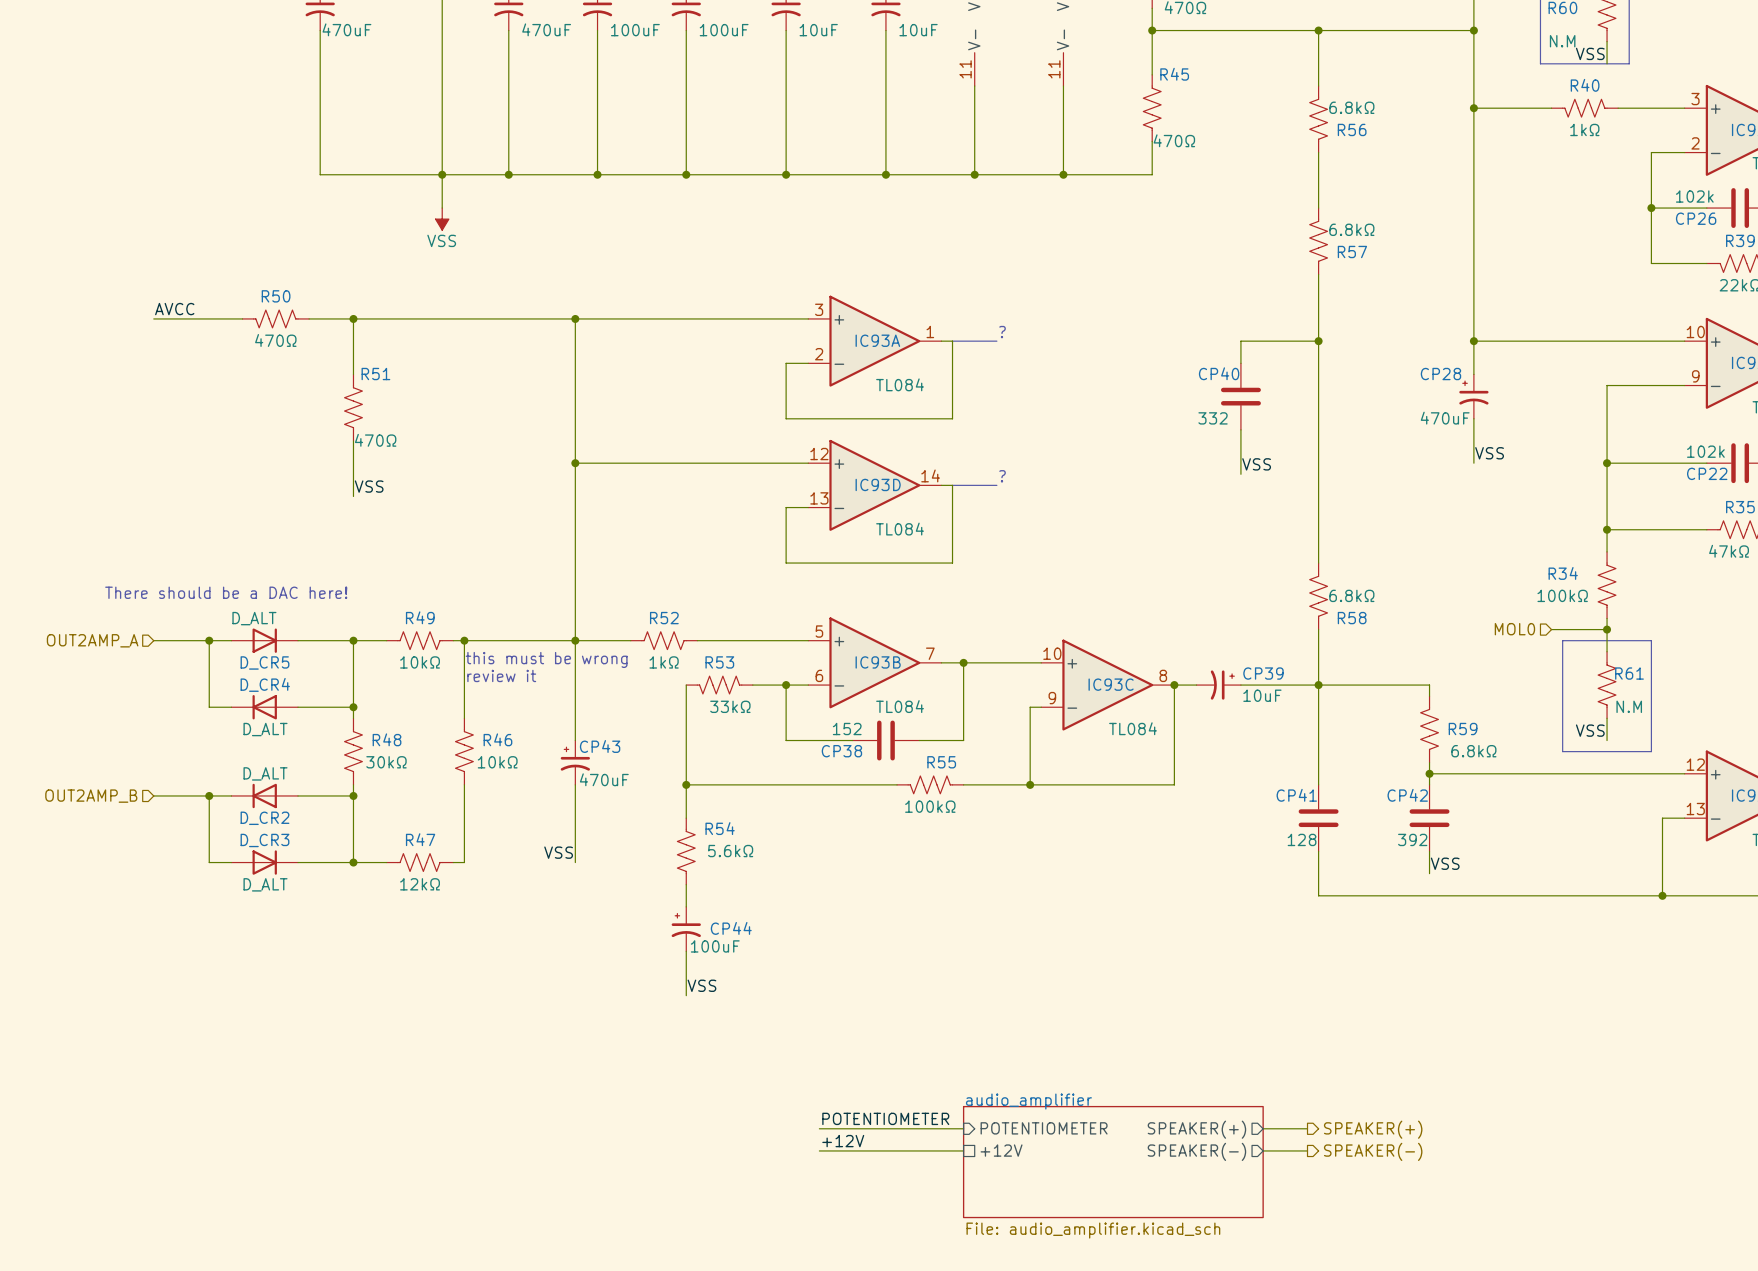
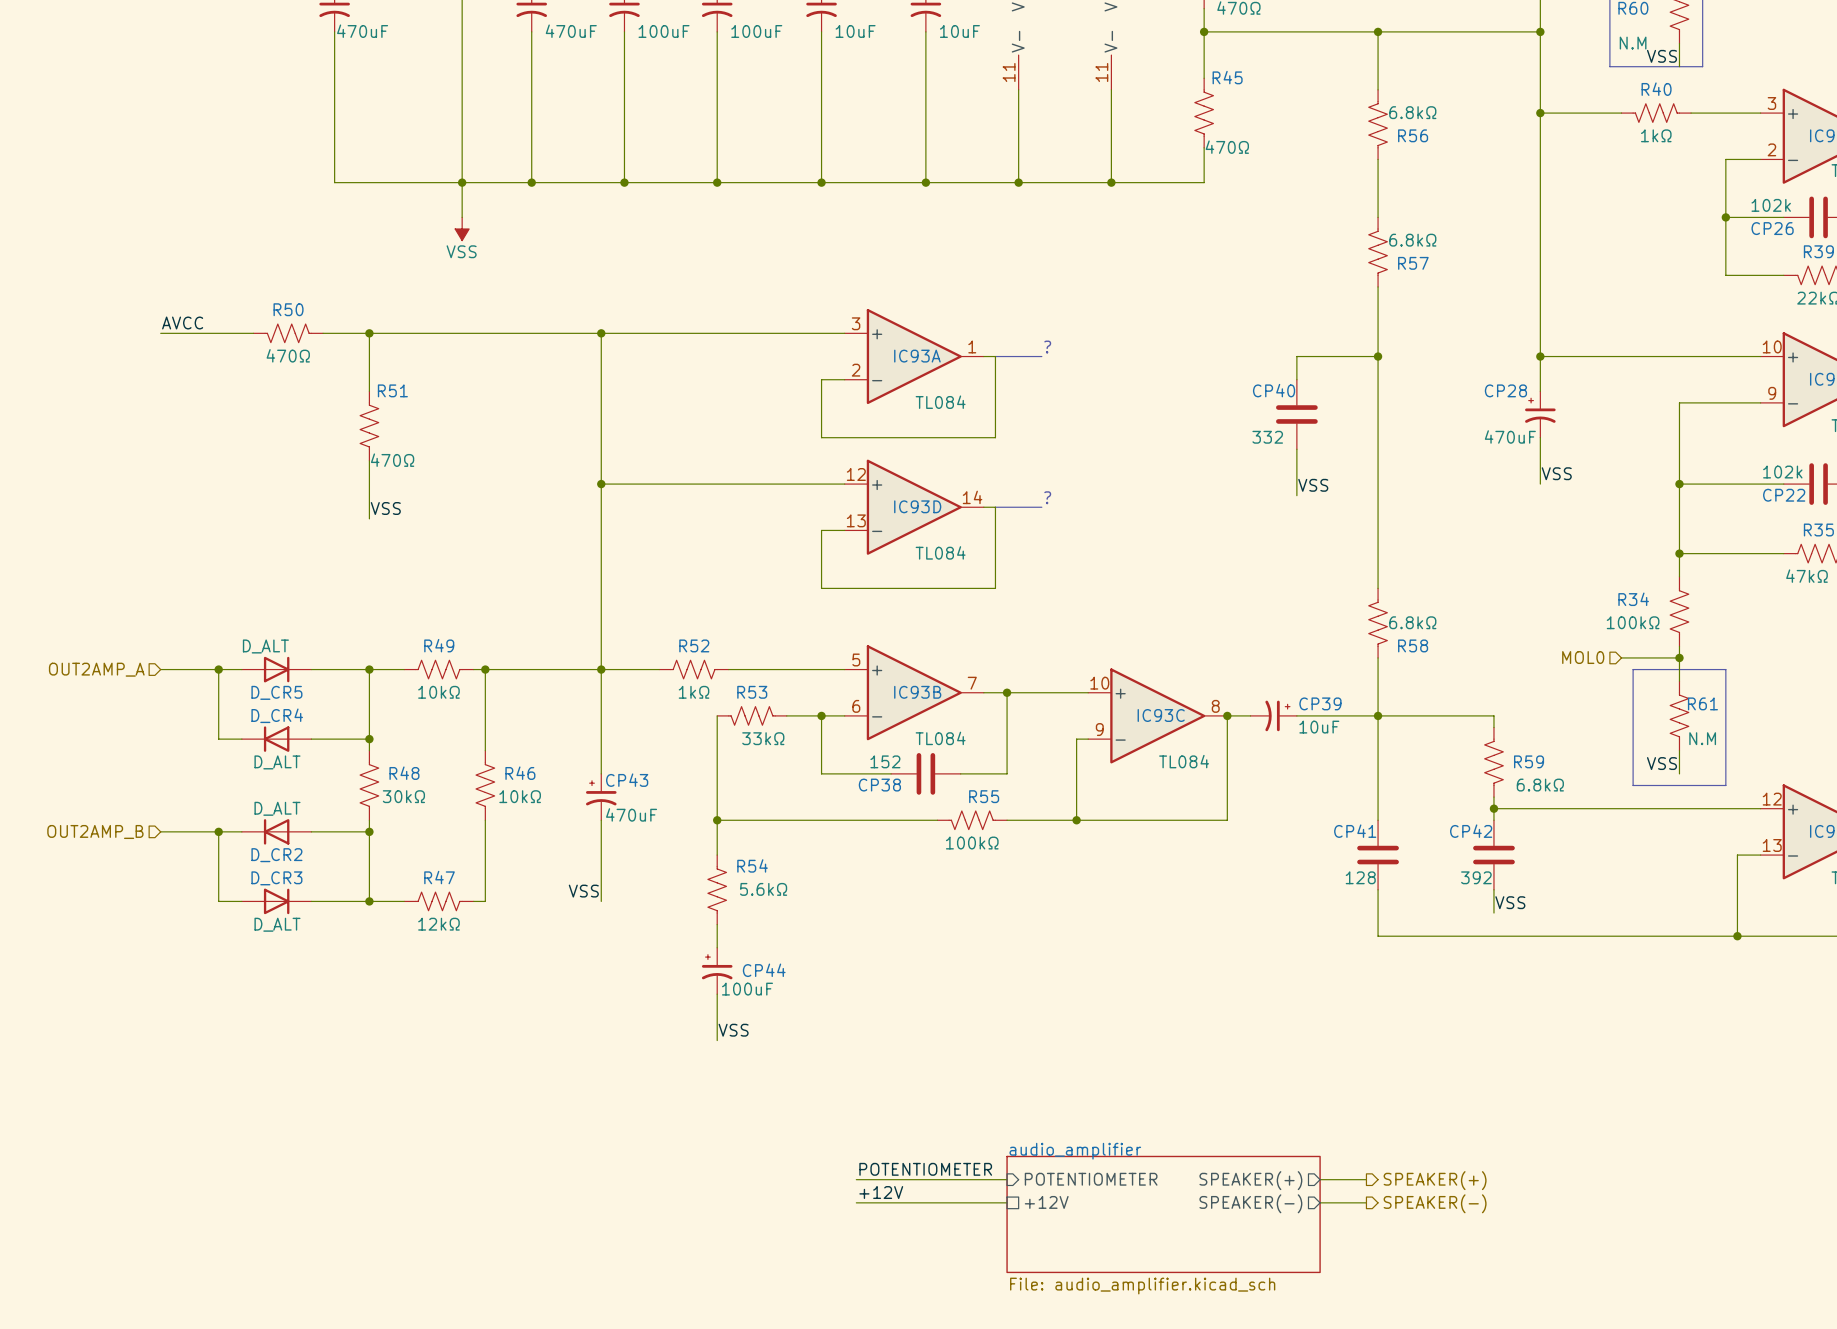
text: There should be a DAC here! (226, 592) -> none
text: this must be wrong (546, 659) -> none
text: review it (501, 675) -> none

